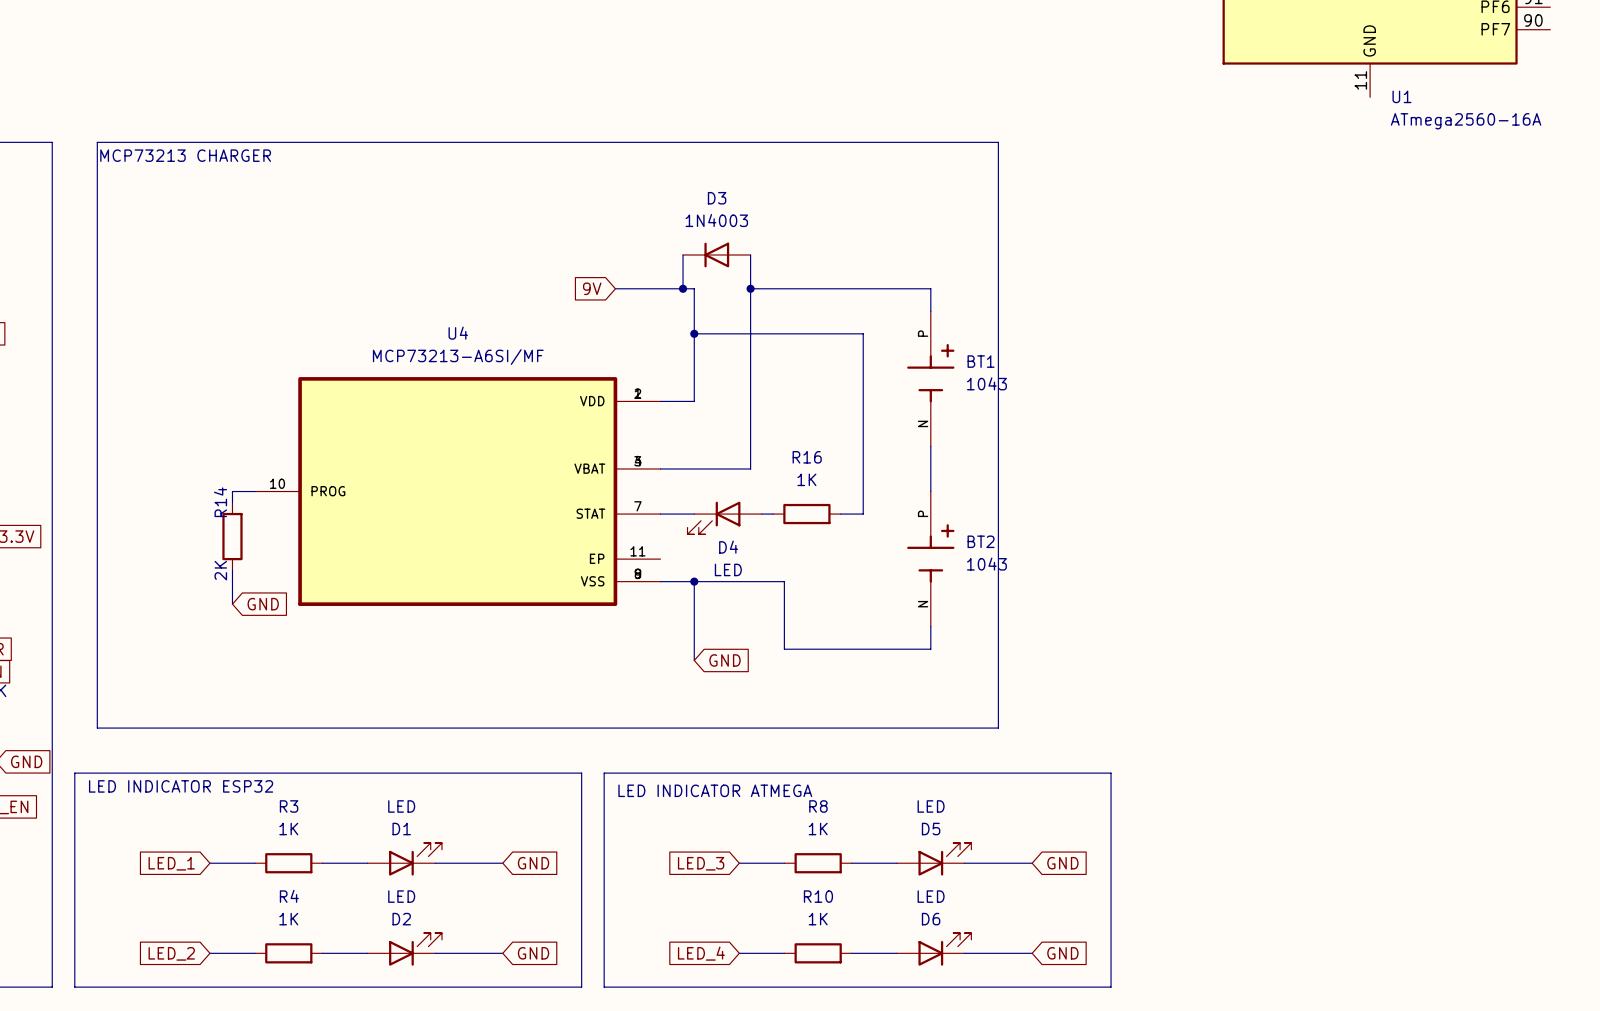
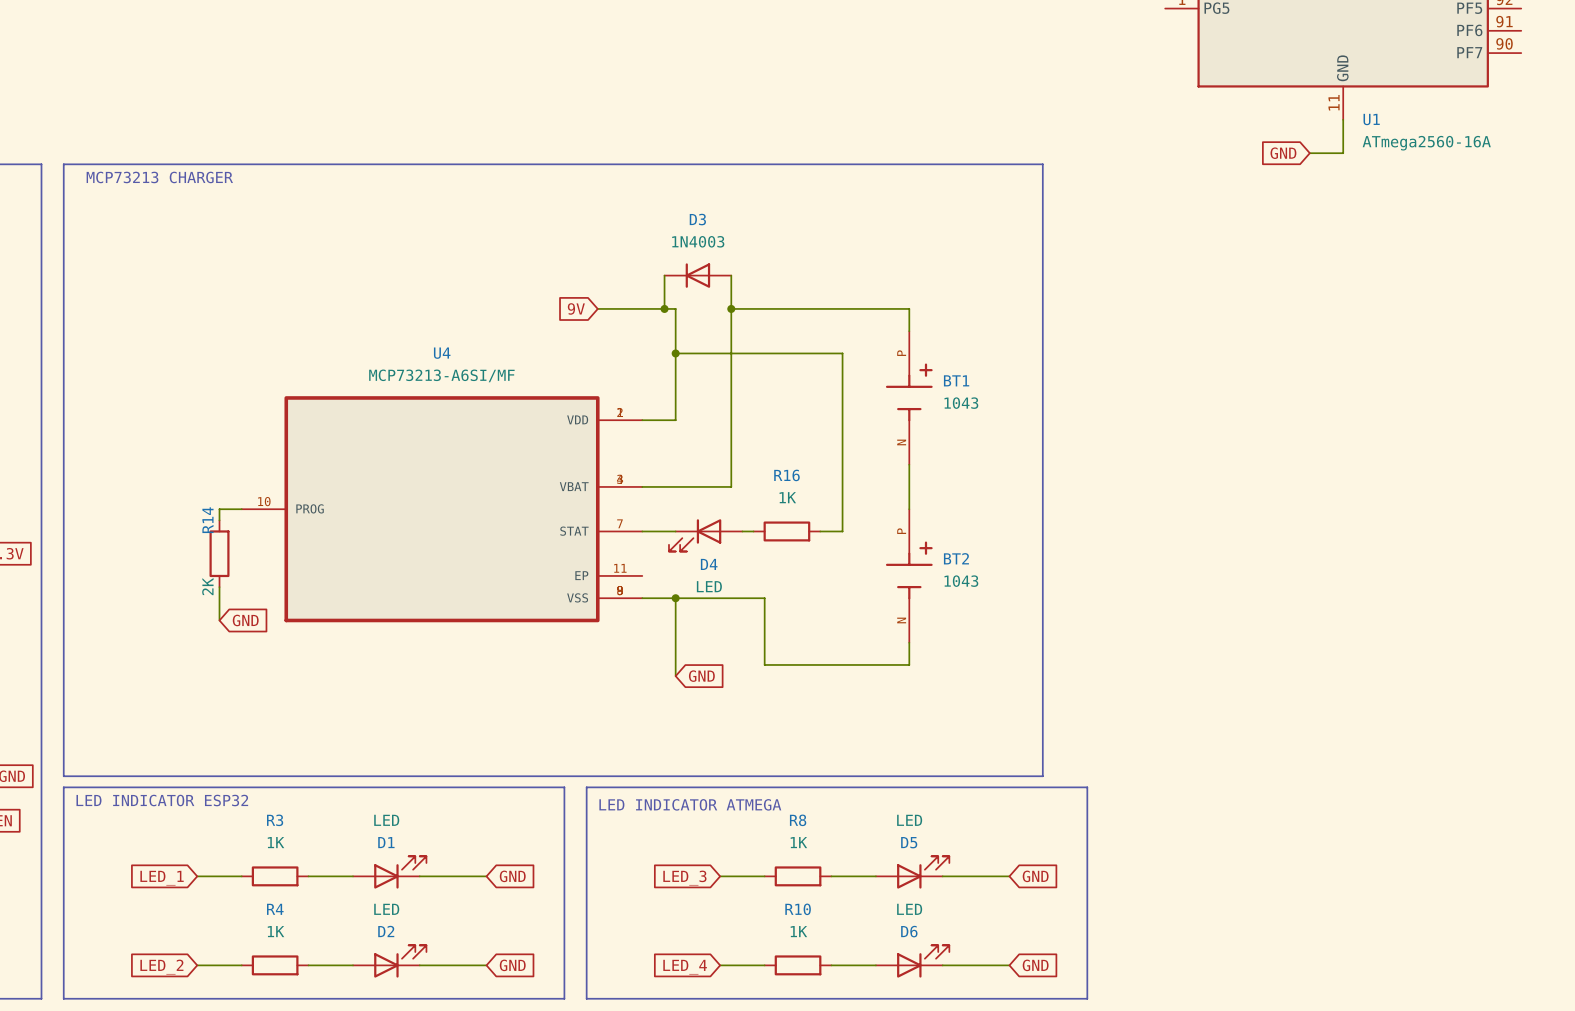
wire: none -> (1343, 119) (1343, 153) (1309, 153)
global label: none -> GND (1283, 153)
line: (97, 142) (97, 728) (998, 728) (998, 142) -> (86, 164) (63, 164) (63, 776) (1042, 776) (1042, 164) (976, 164)

